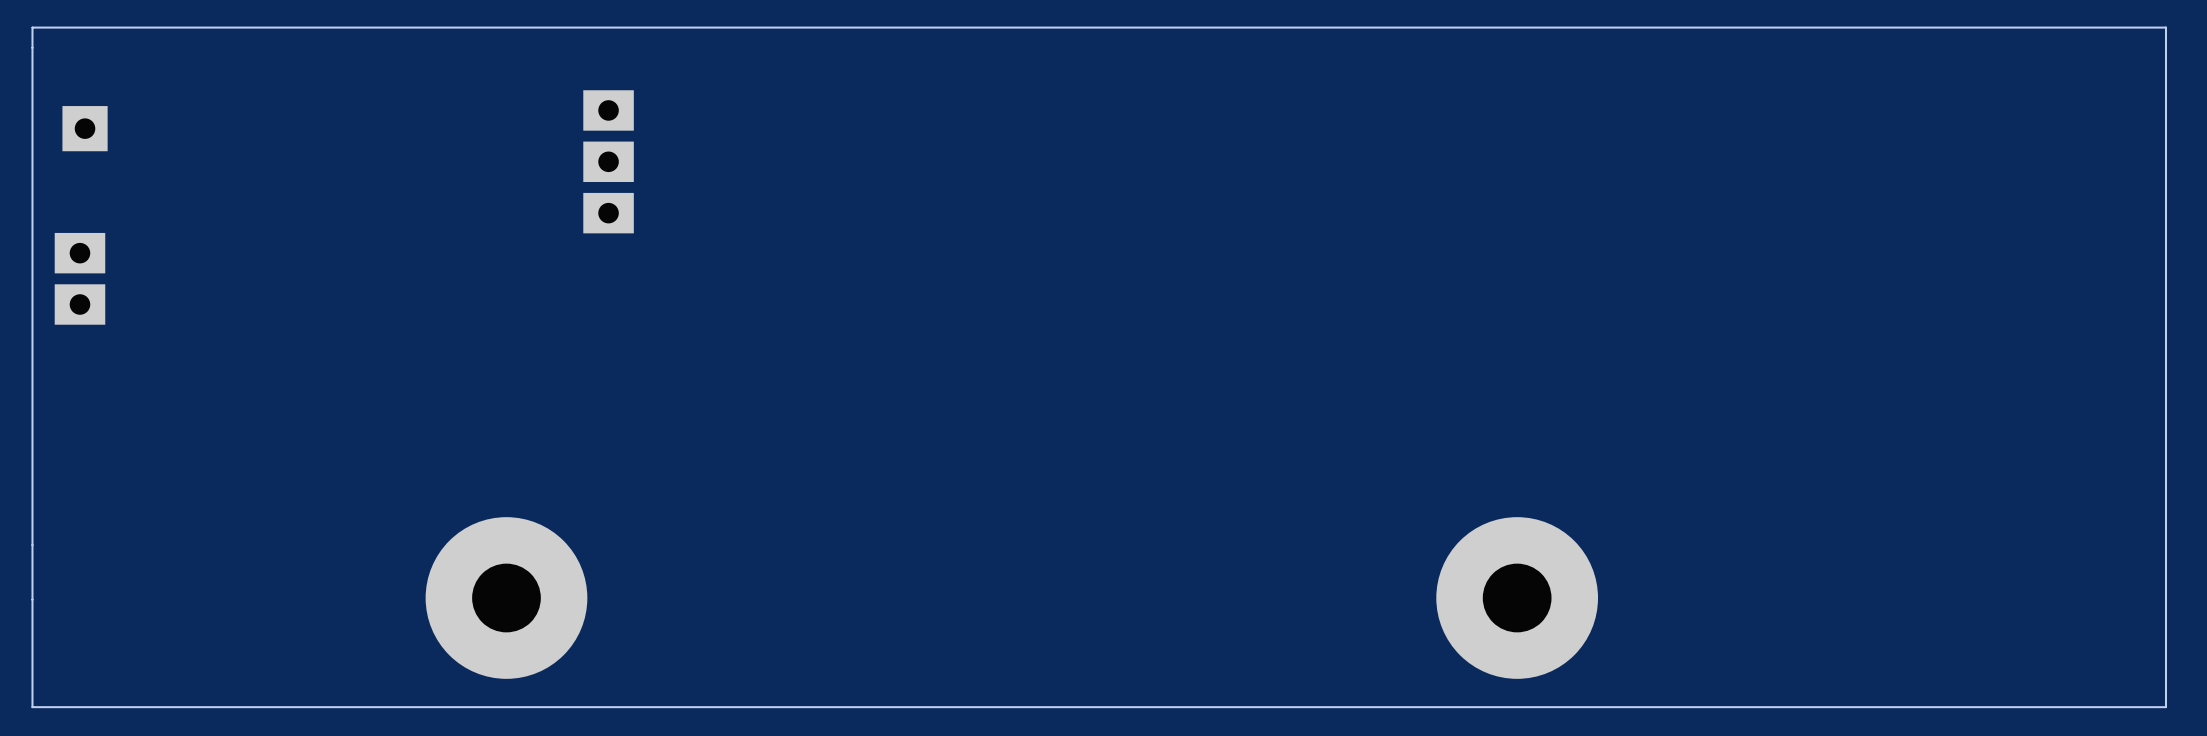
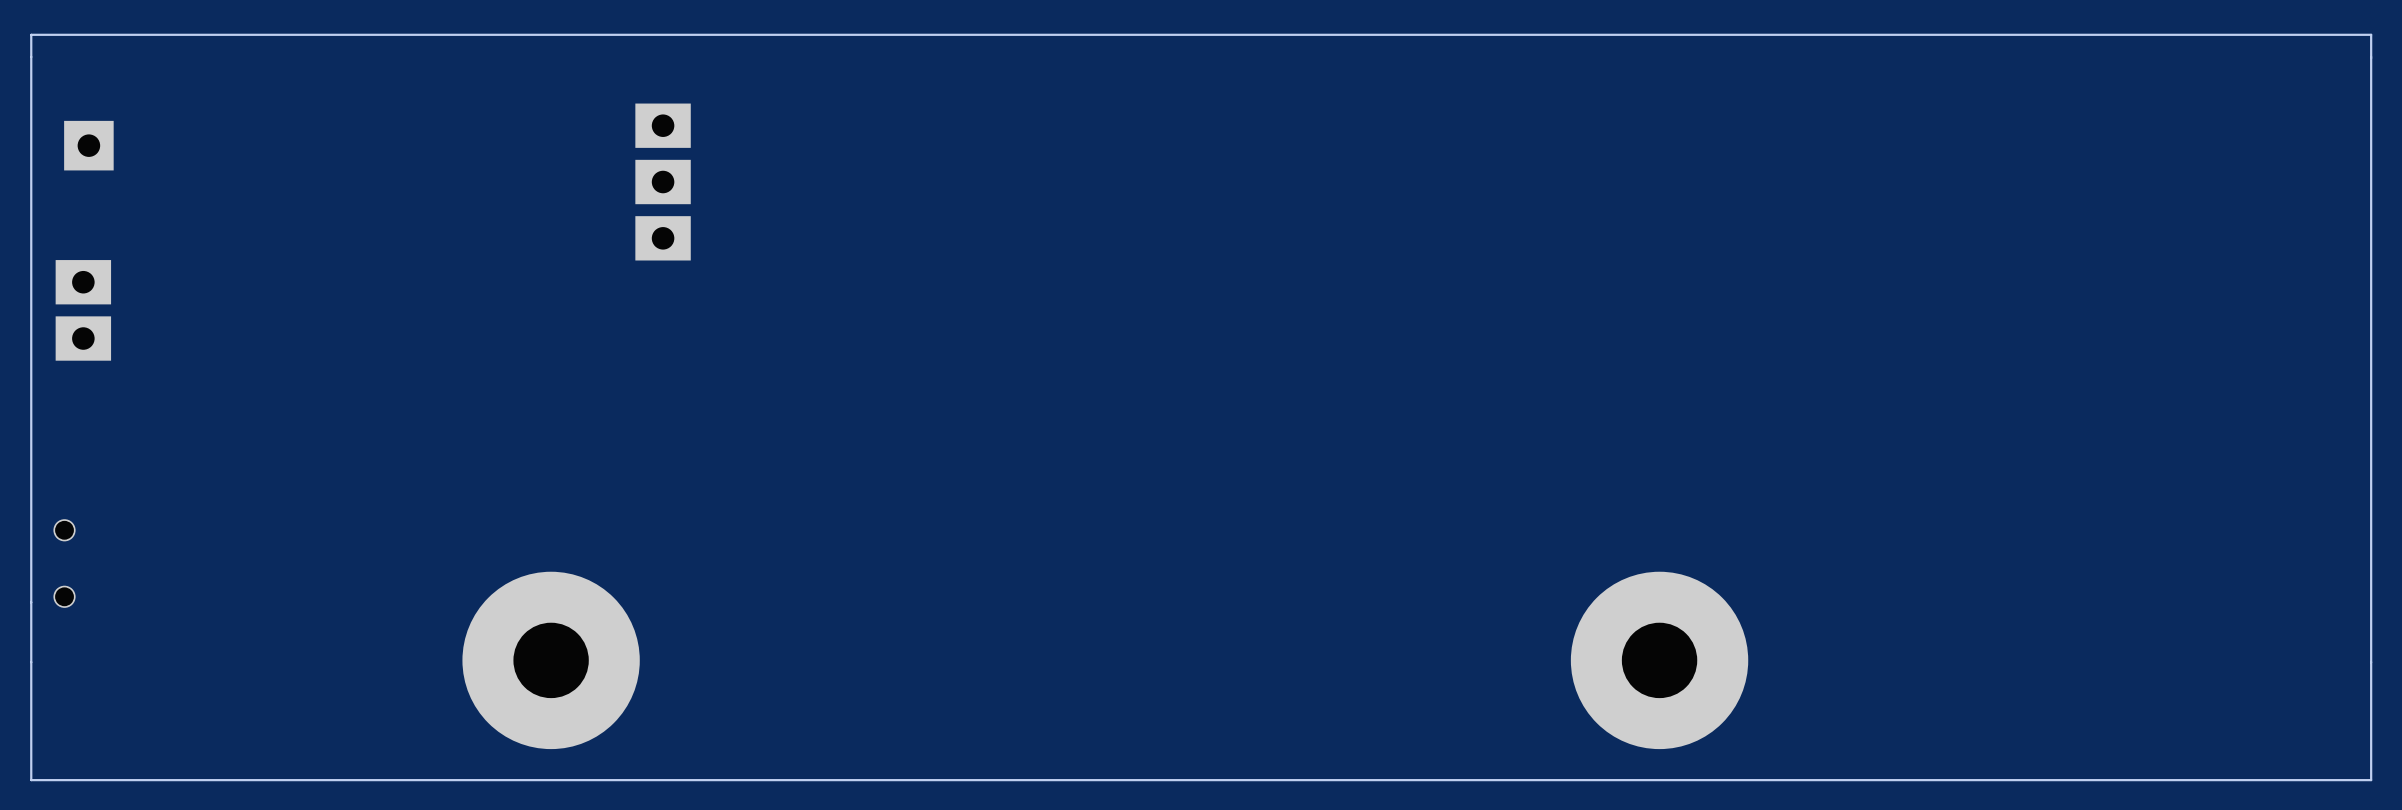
part: none -> (64, 563)

